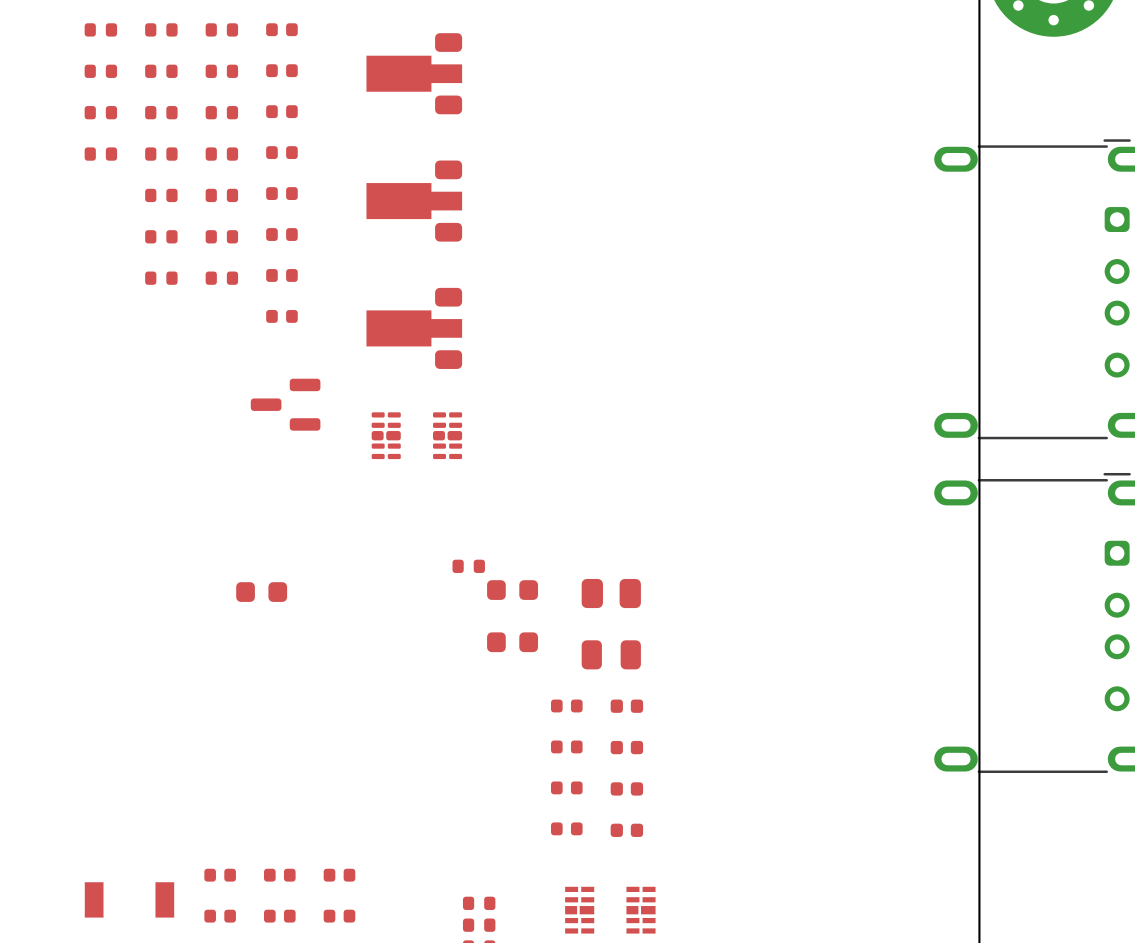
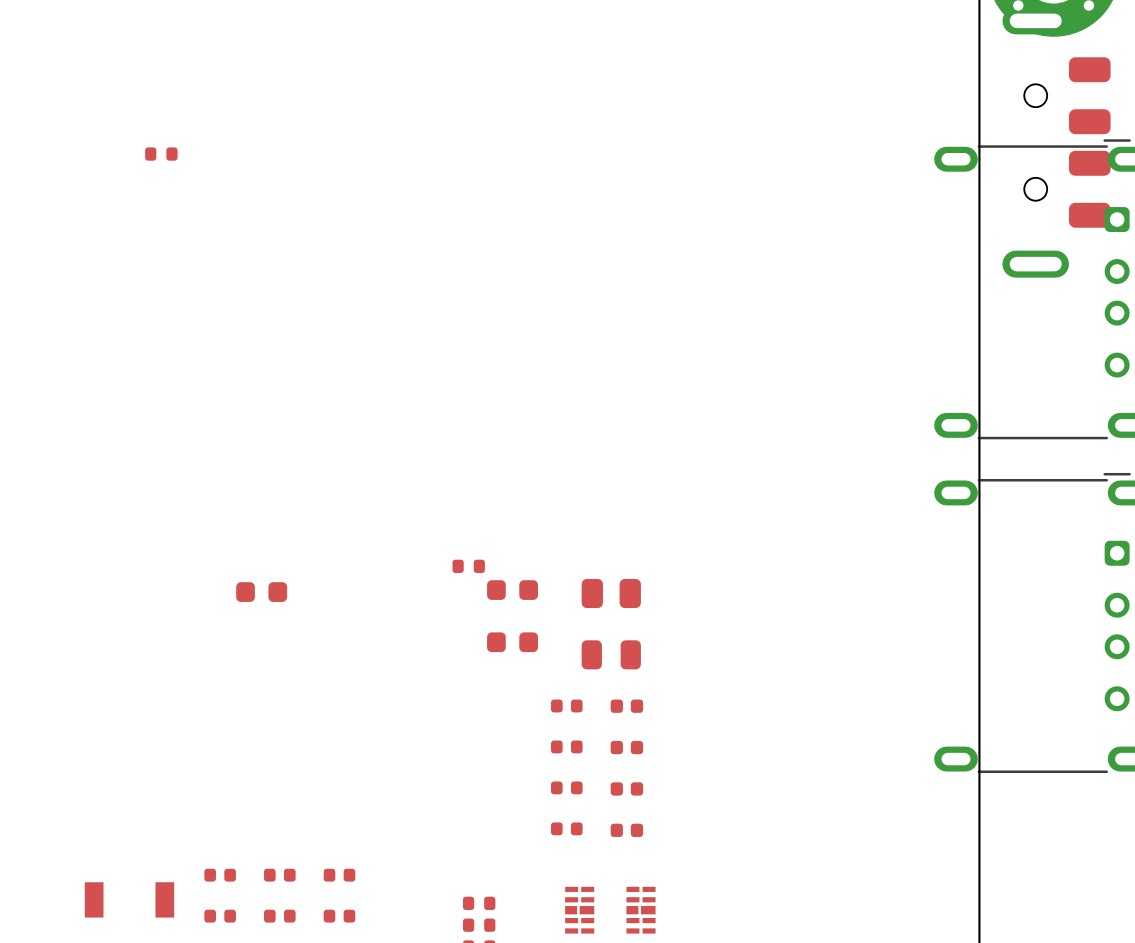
part: (100, 29) -> none
part: (161, 29) -> none
part: (221, 29) -> none
part: (281, 29) -> none
part: (281, 70) -> none
part: (100, 71) -> none
part: (161, 71) -> none
part: (221, 71) -> none
part: (414, 73) -> none
part: (281, 111) -> none
part: (100, 112) -> none
part: (161, 112) -> none
part: (221, 112) -> none
part: none -> (1056, 142)
part: (281, 152) -> none
part: (100, 154) -> none
part: (221, 154) -> none
part: (281, 193) -> none
part: (161, 195) -> none
part: (221, 195) -> none
part: (414, 201) -> none
part: (281, 234) -> none
part: (161, 236) -> none
part: (221, 236) -> none
part: (281, 275) -> none
part: (161, 278) -> none
part: (221, 278) -> none
part: (281, 316) -> none
part: (414, 328) -> none
part: (285, 404) -> none
part: (386, 435) -> none
part: (447, 435) -> none

